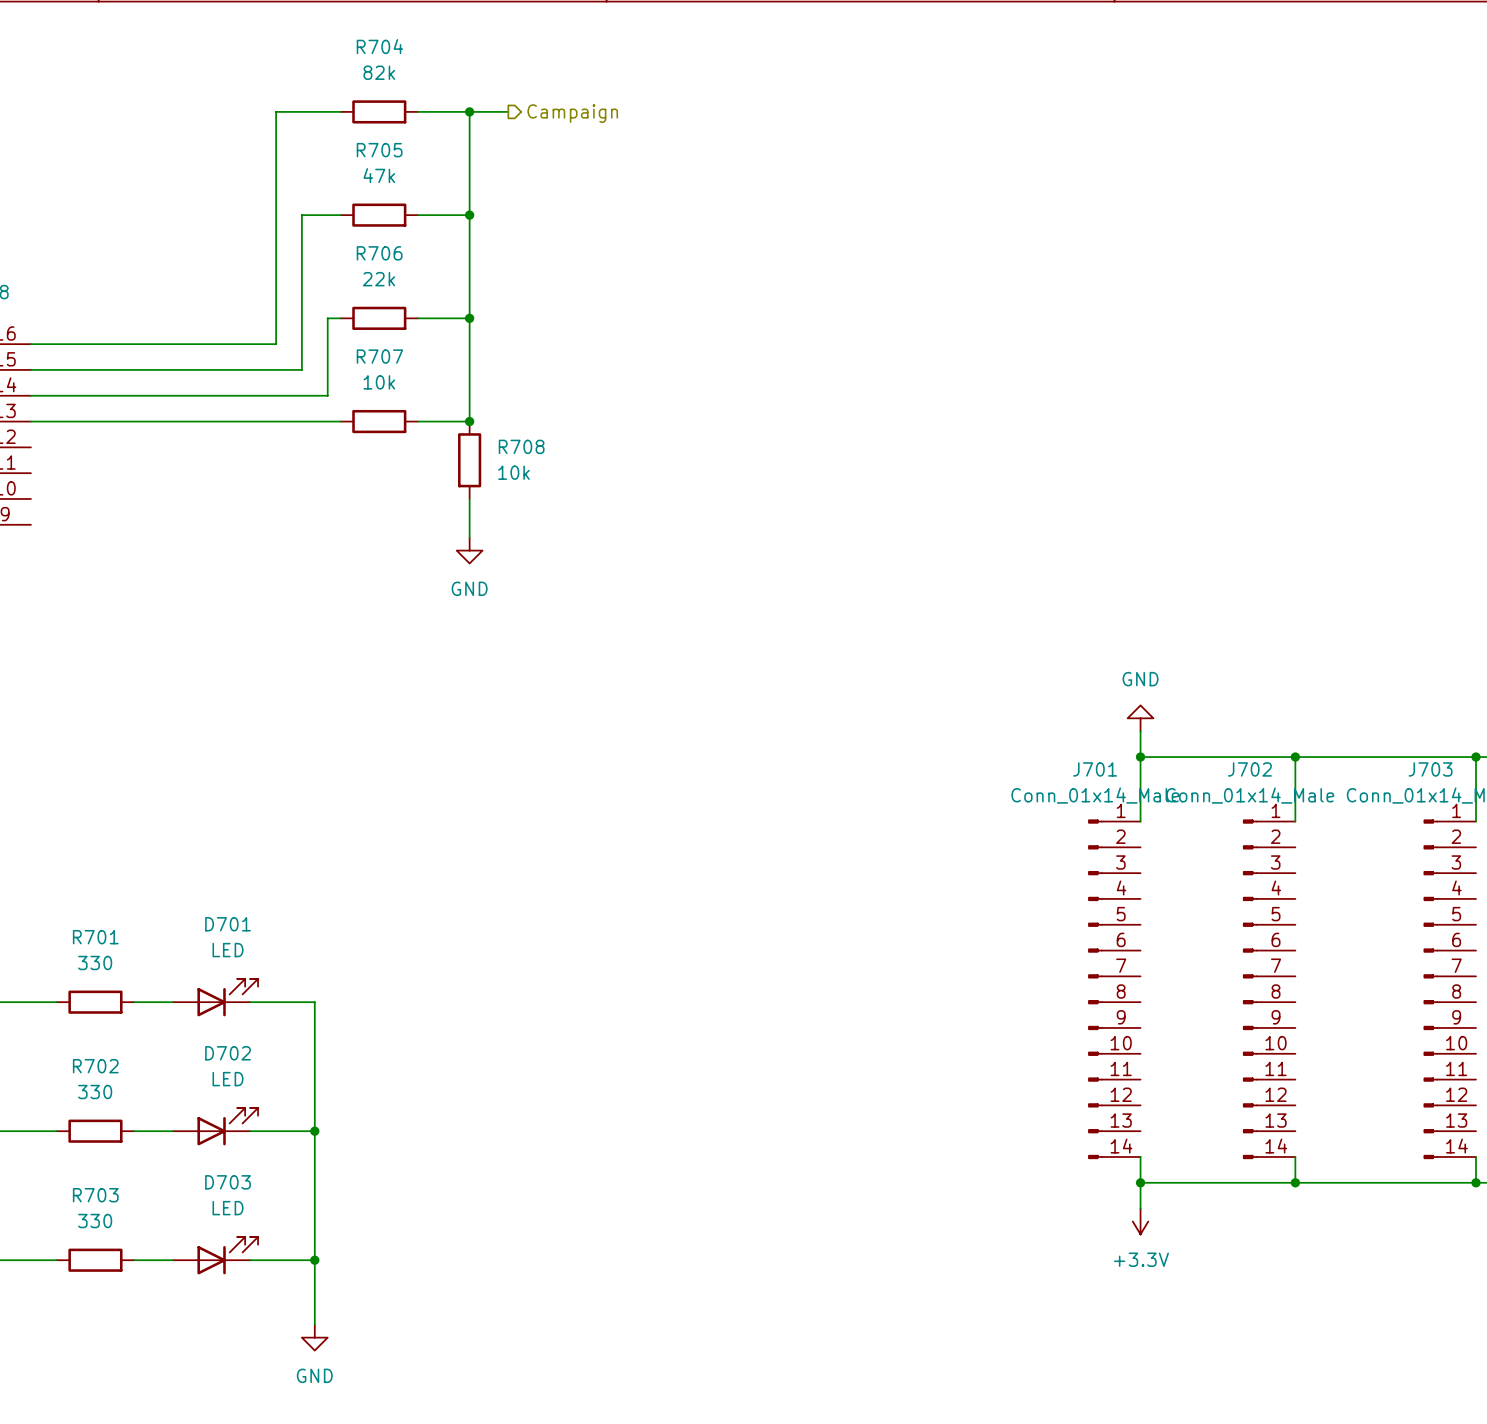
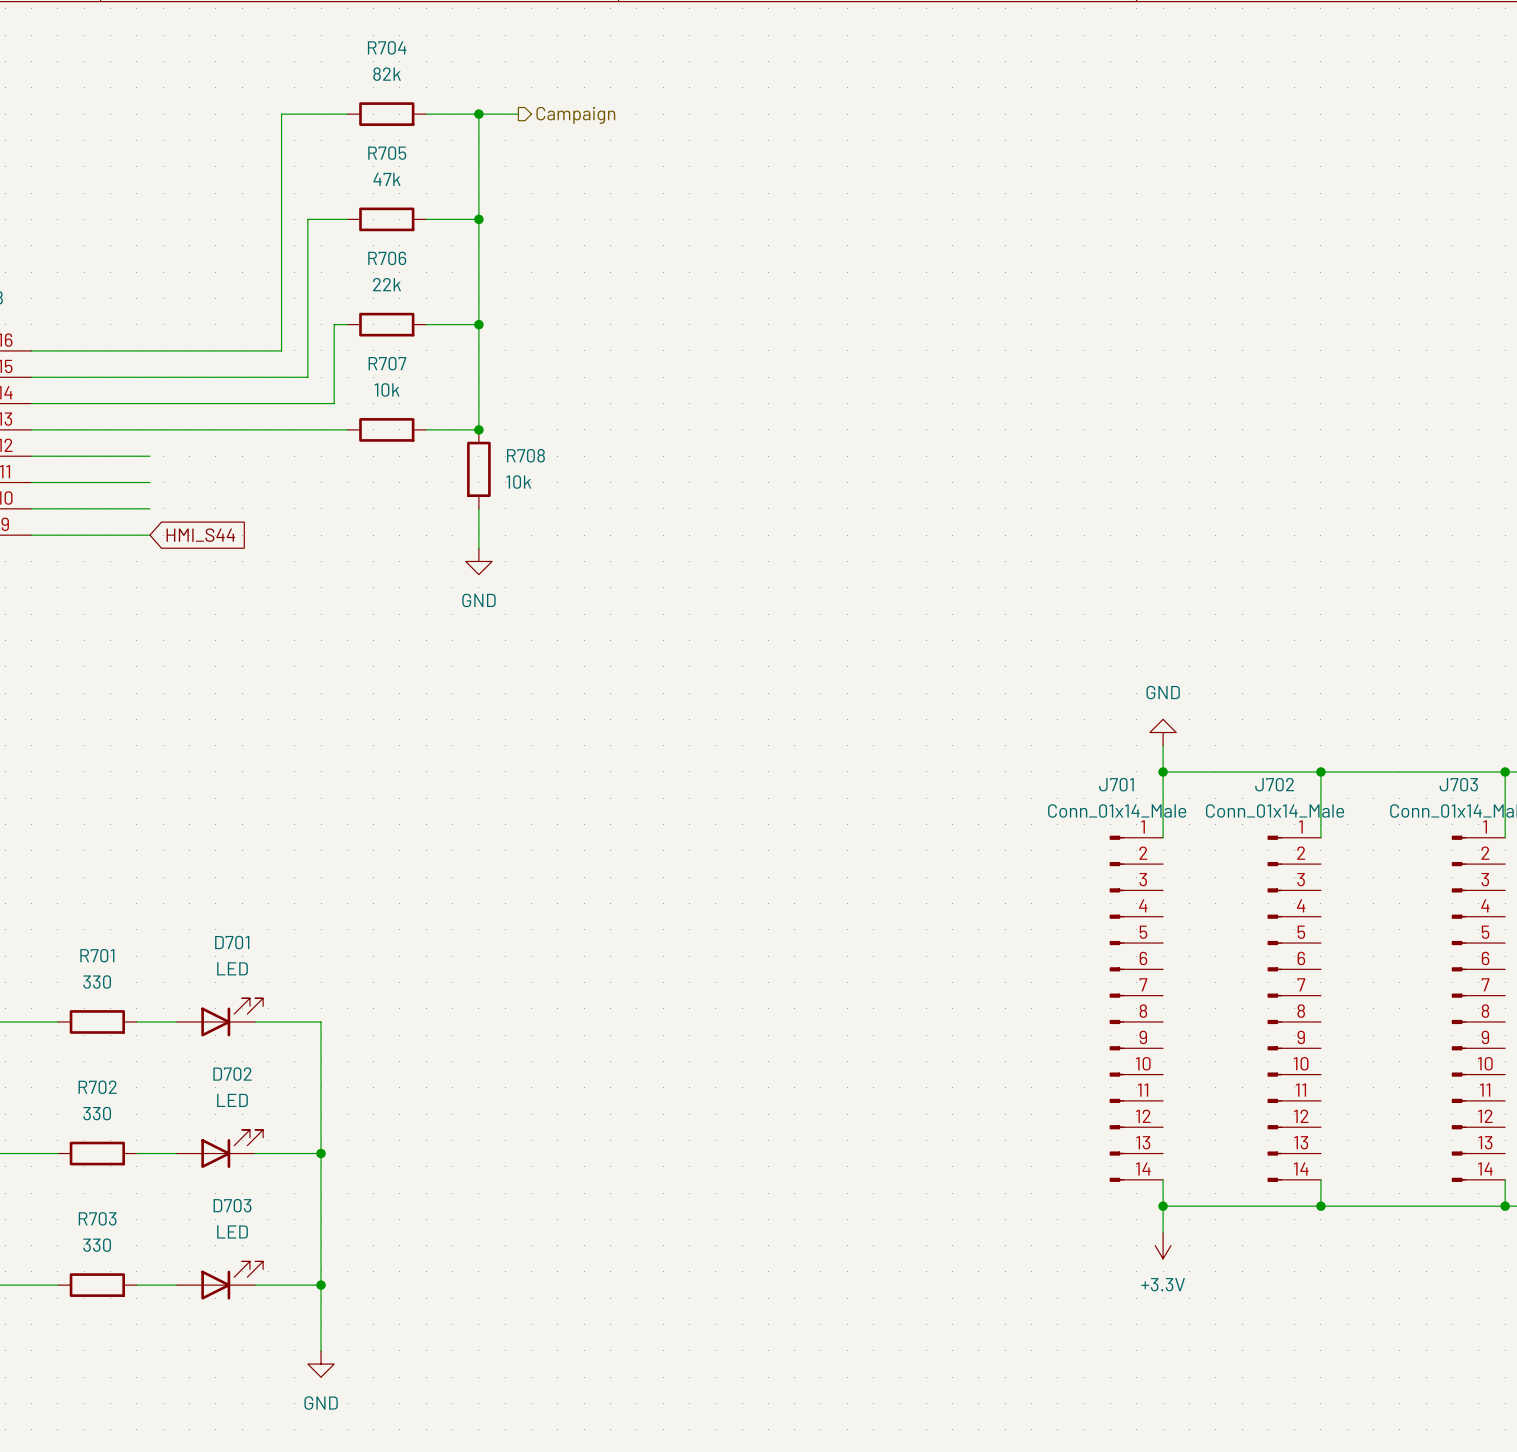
wire: none -> (31, 456) (149, 456)
wire: none -> (31, 482) (149, 482)
wire: none -> (31, 508) (149, 508)
wire: none -> (31, 535) (149, 535)
global label: none -> HMI_S44 (200, 535)

